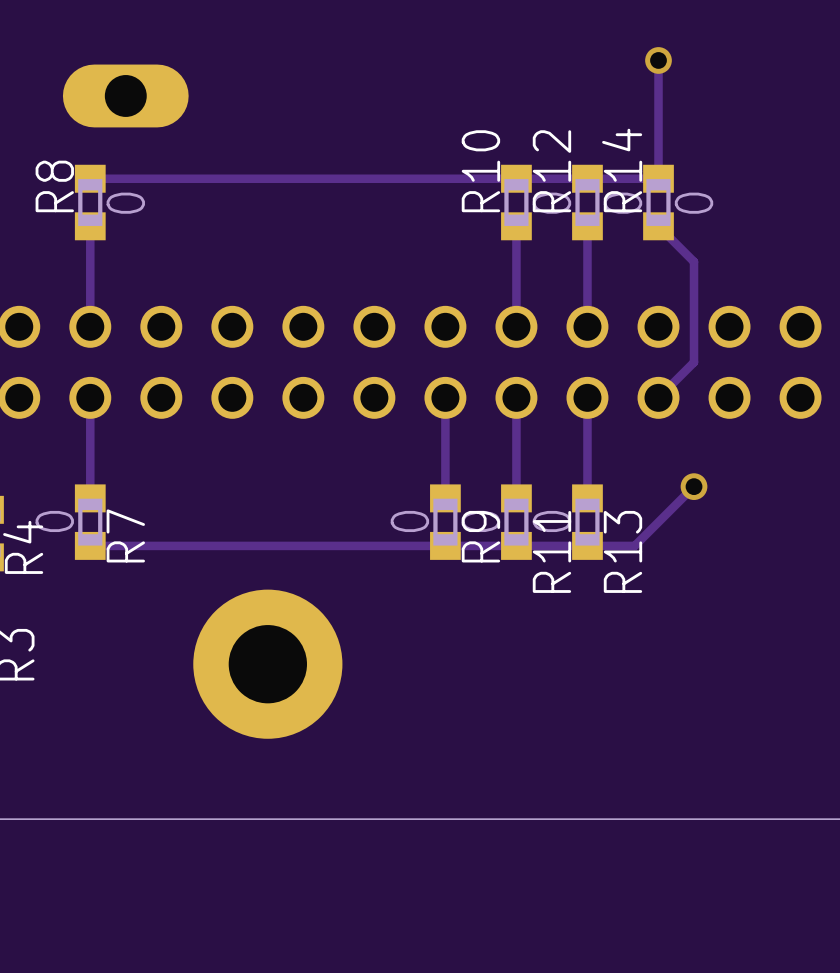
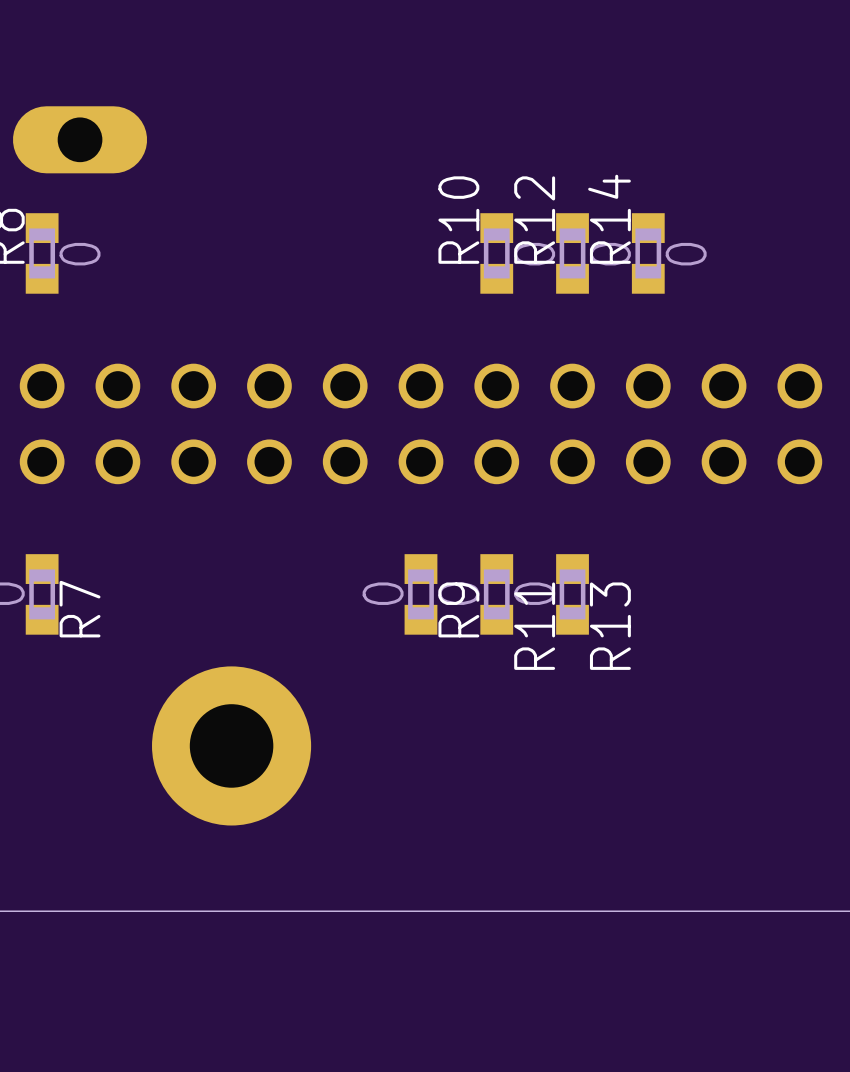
track: (658, 60) (658, 178) (90, 178) -> none
via: (658, 60) -> none
track: (90, 226) (90, 326) -> none
track: (516, 226) (516, 326) -> none
track: (587, 226) (587, 326) -> none
track: (658, 226) (694, 261) (694, 362) (658, 397) -> none
track: (90, 397) (90, 498) -> none
track: (445, 397) (445, 498) -> none
track: (516, 397) (516, 498) -> none
track: (587, 397) (587, 498) -> none
track: (694, 486) (634, 545) (90, 545) -> none
via: (694, 486) -> none

